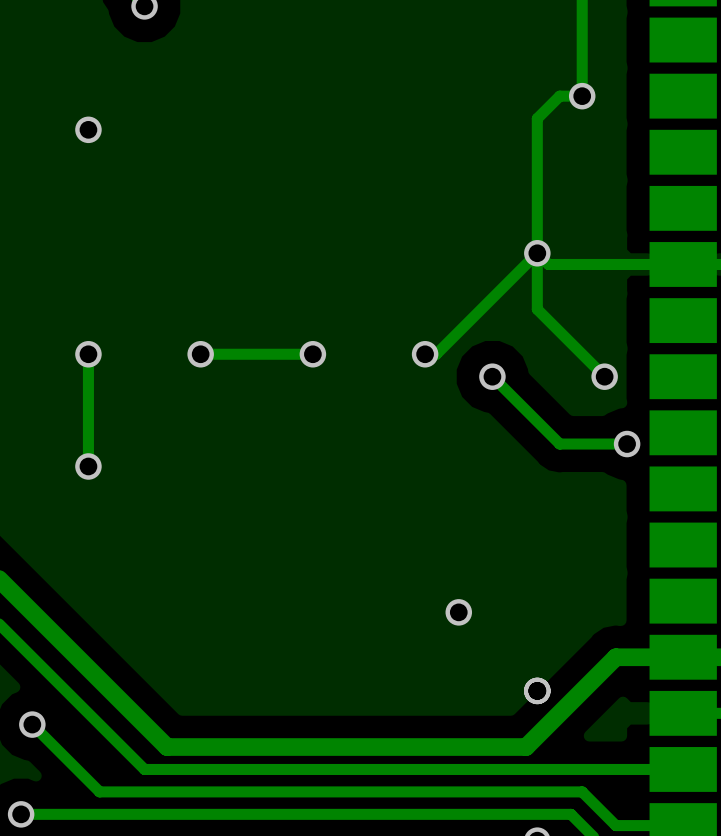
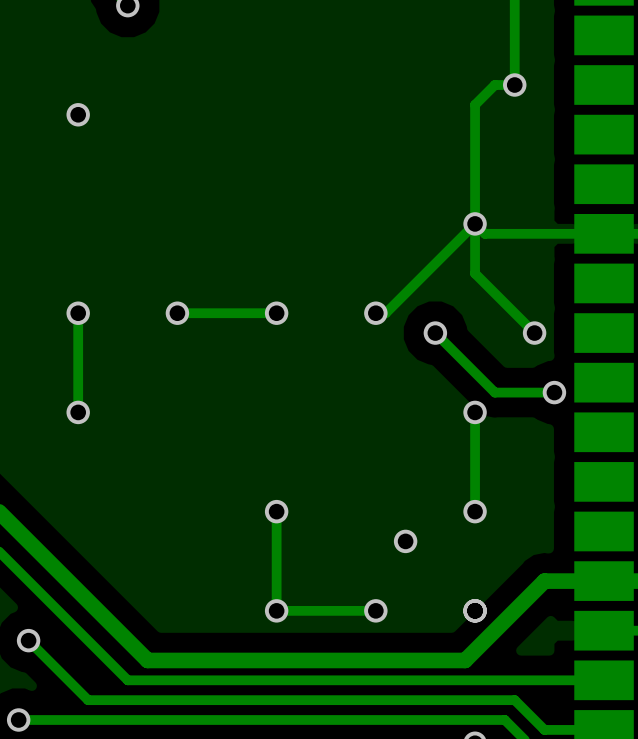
track: none -> (475, 412) (475, 511)
via: none -> (475, 412)
track: none -> (276, 511) (276, 610) (375, 610)
via: none -> (276, 511)
via: none -> (475, 511)
via: none -> (276, 610)
via: none -> (375, 610)

